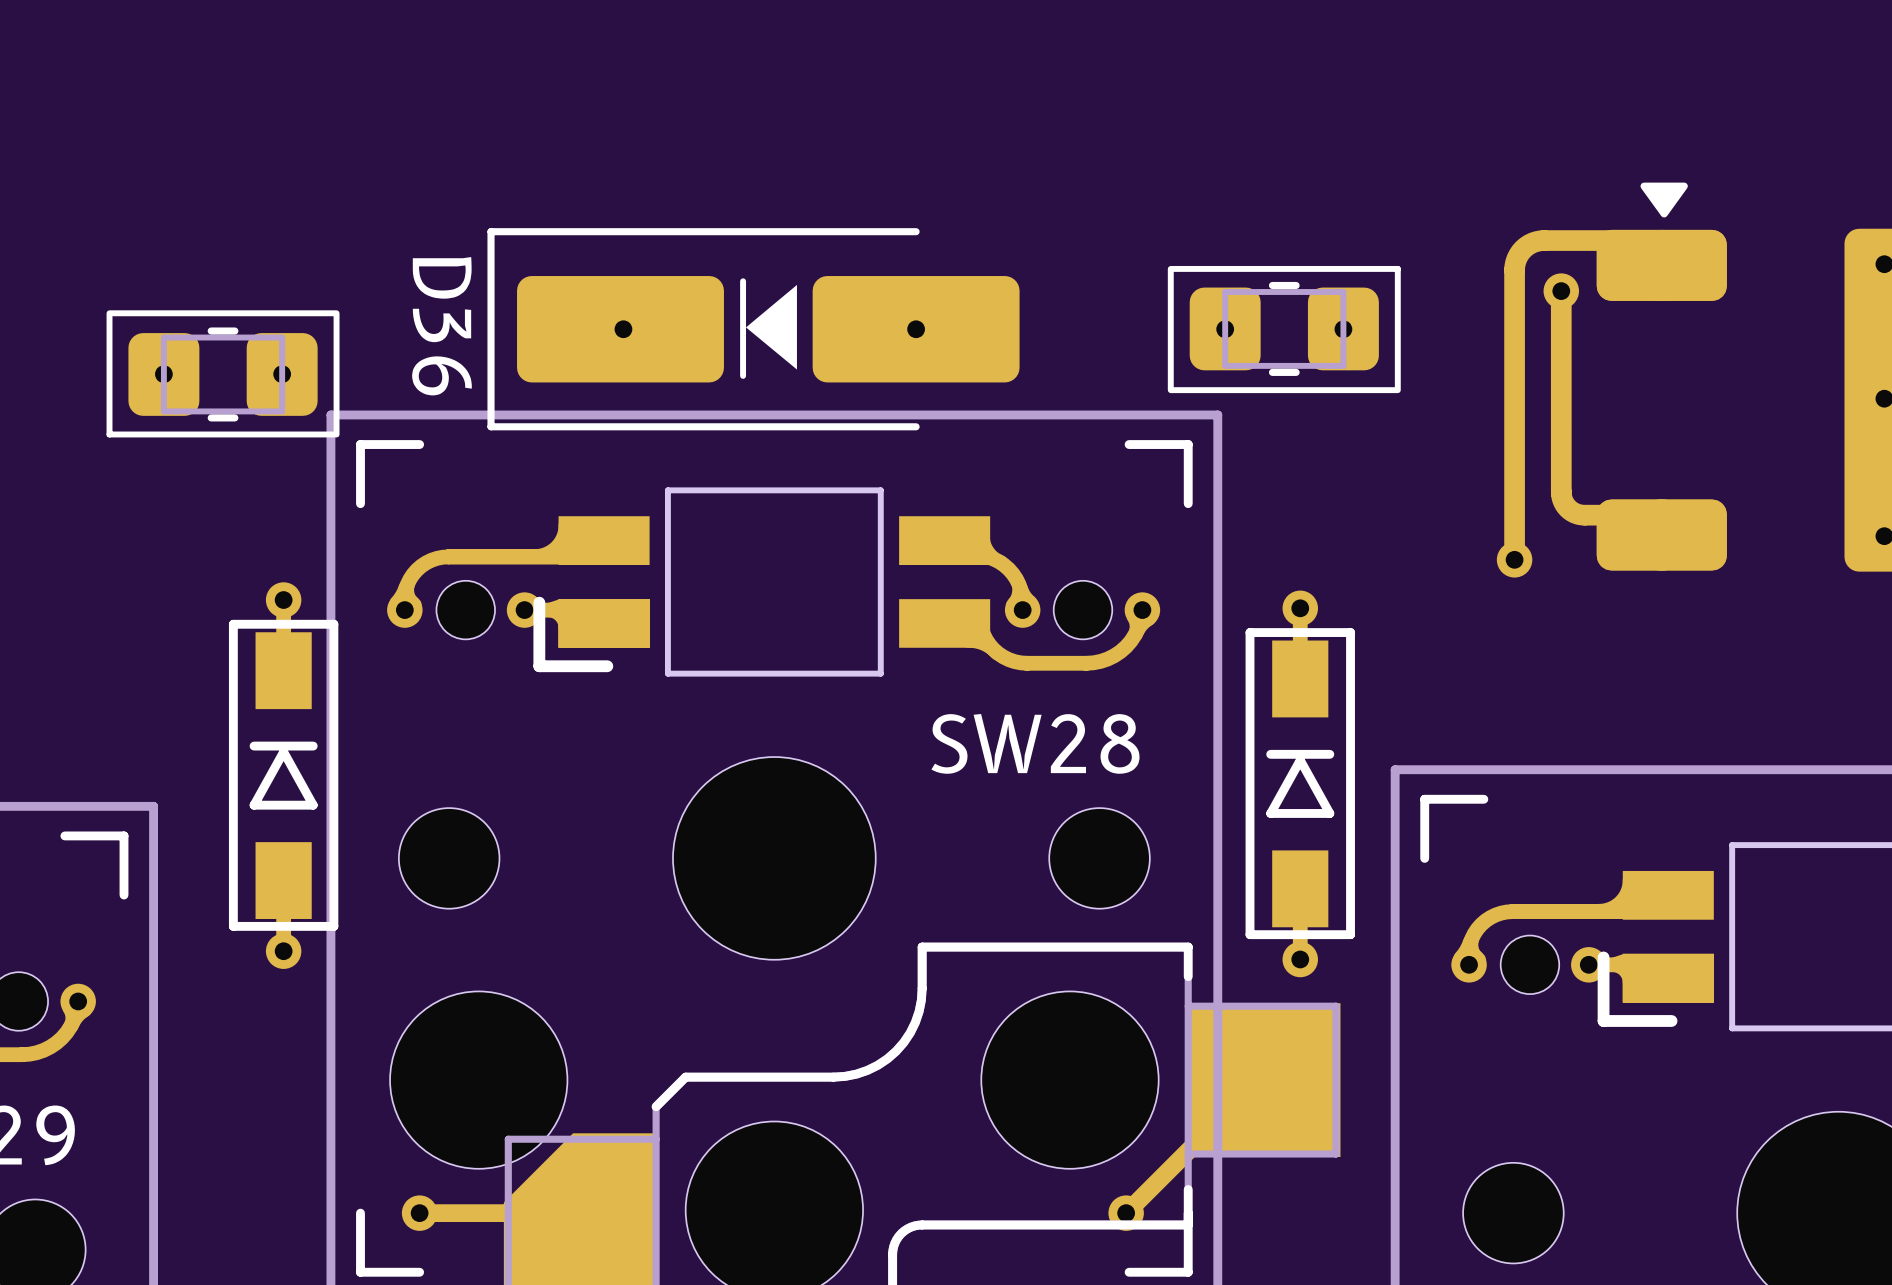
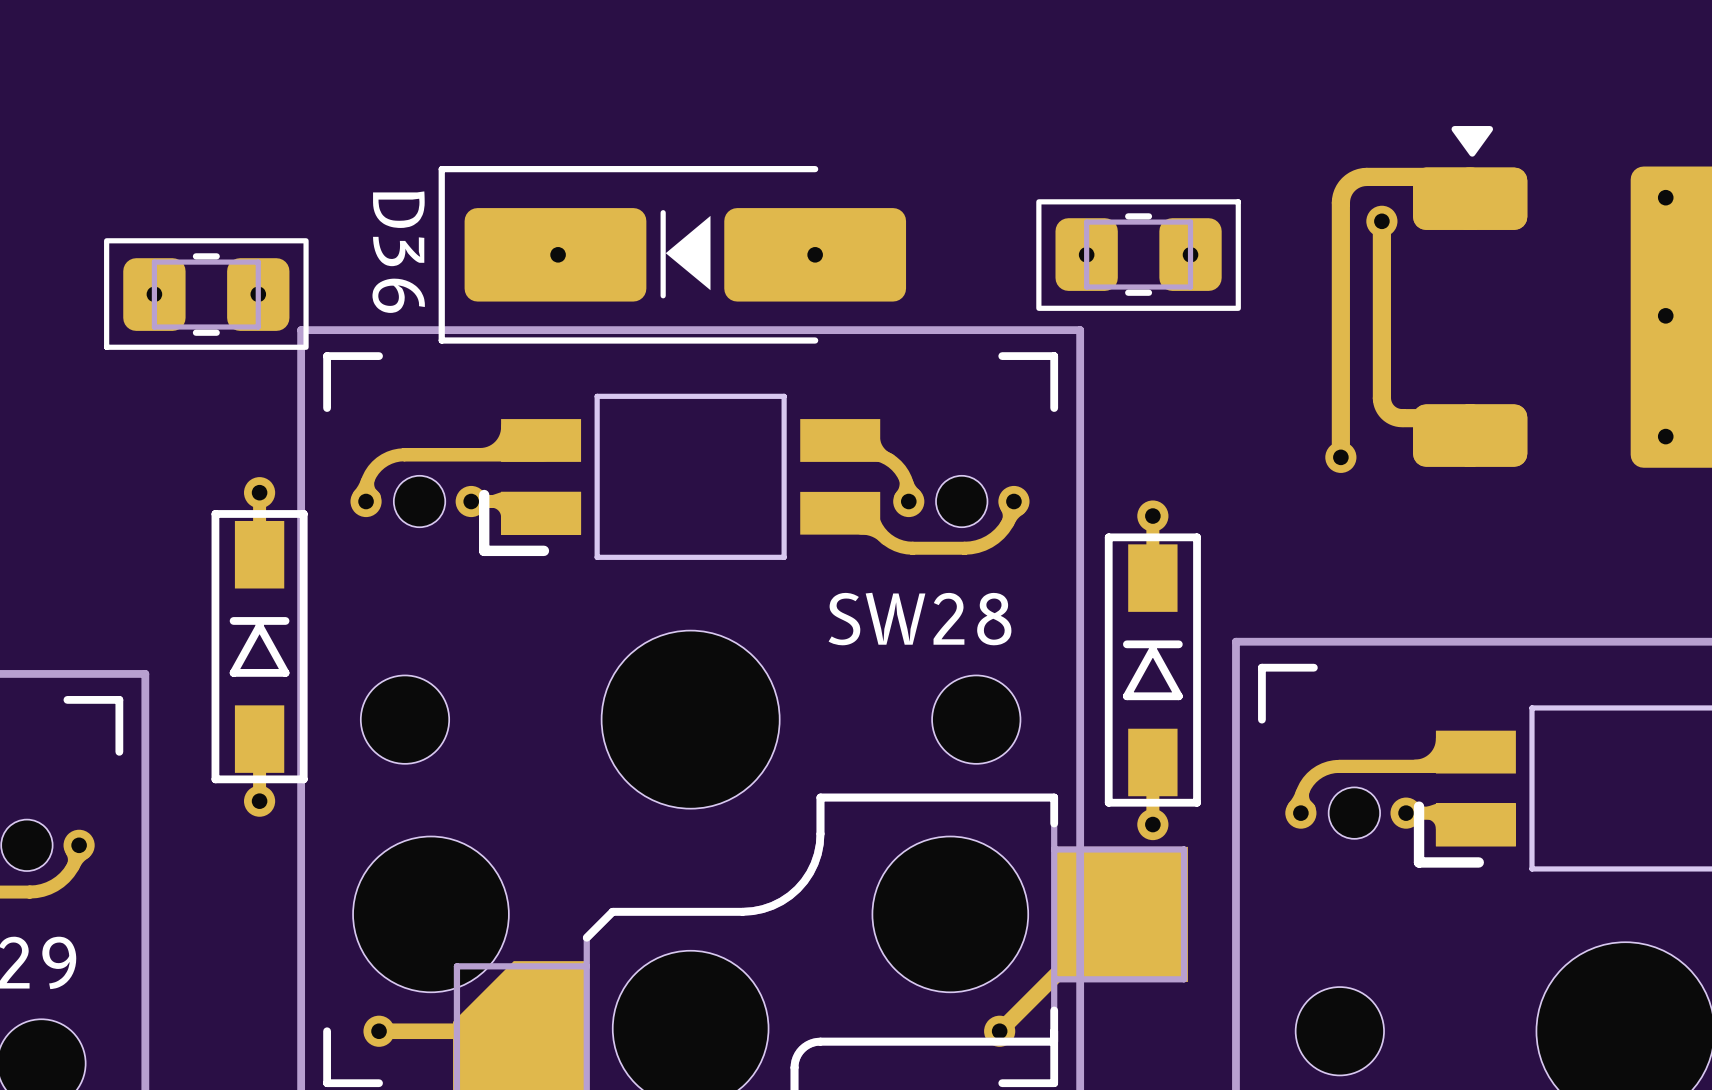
part position: (1300, 783) -> (1152, 670)

